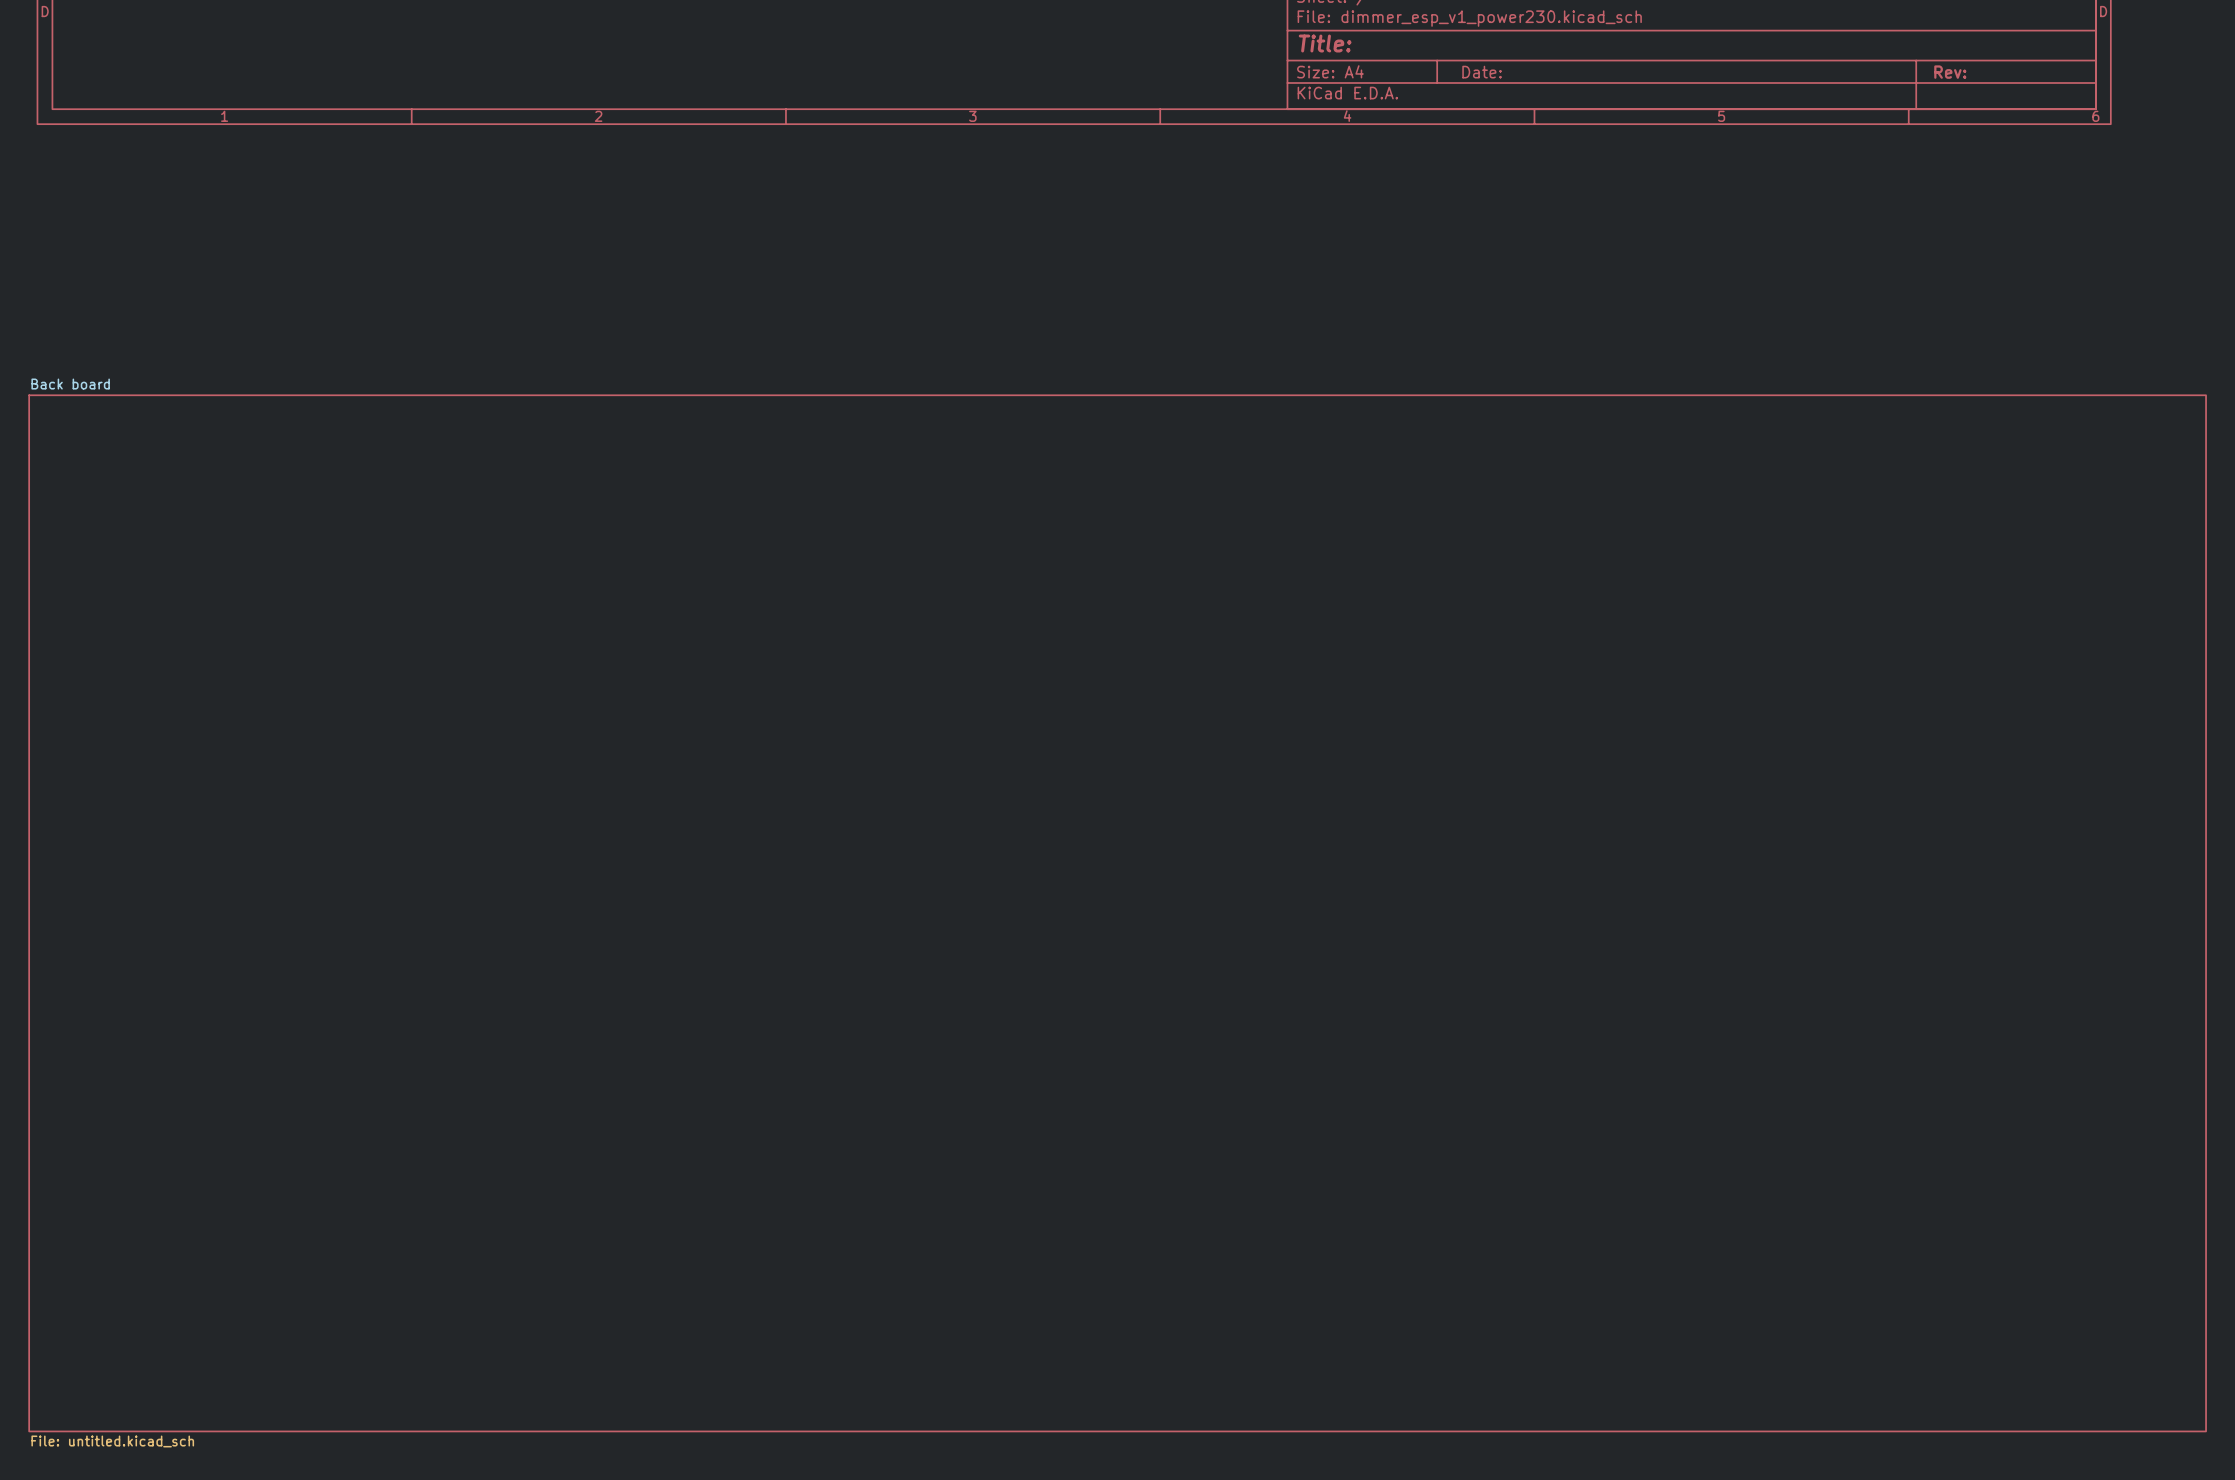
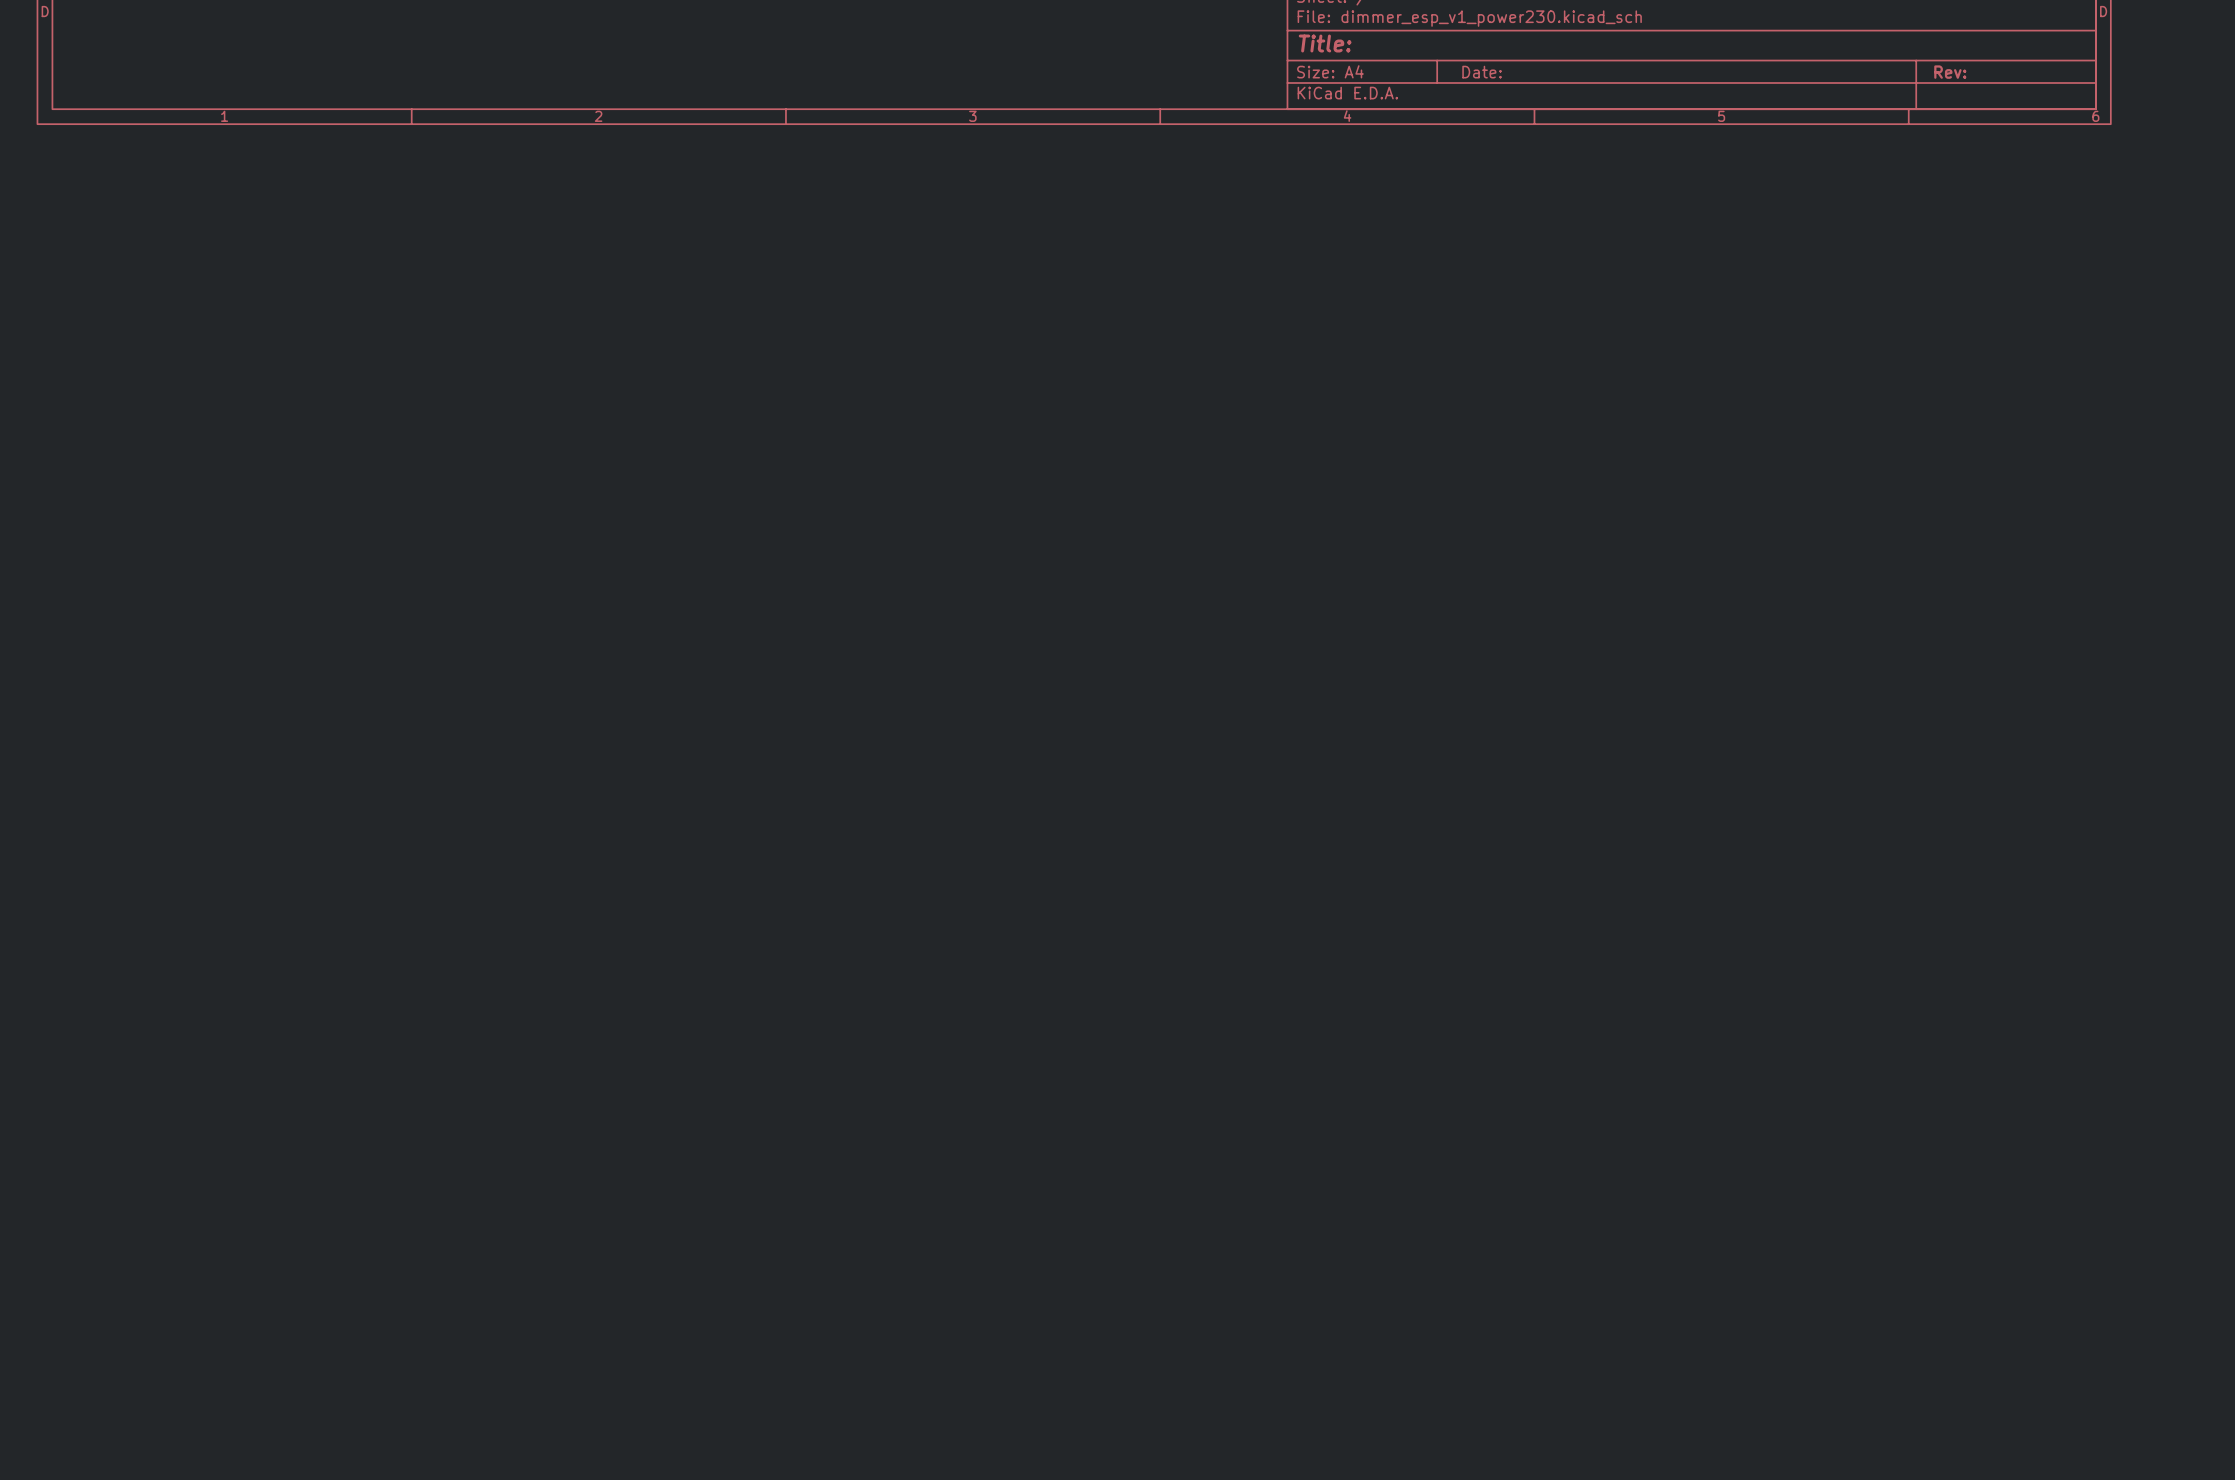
sheet Back board: File: untitled.kicad_sch (1117, 913) -> none

